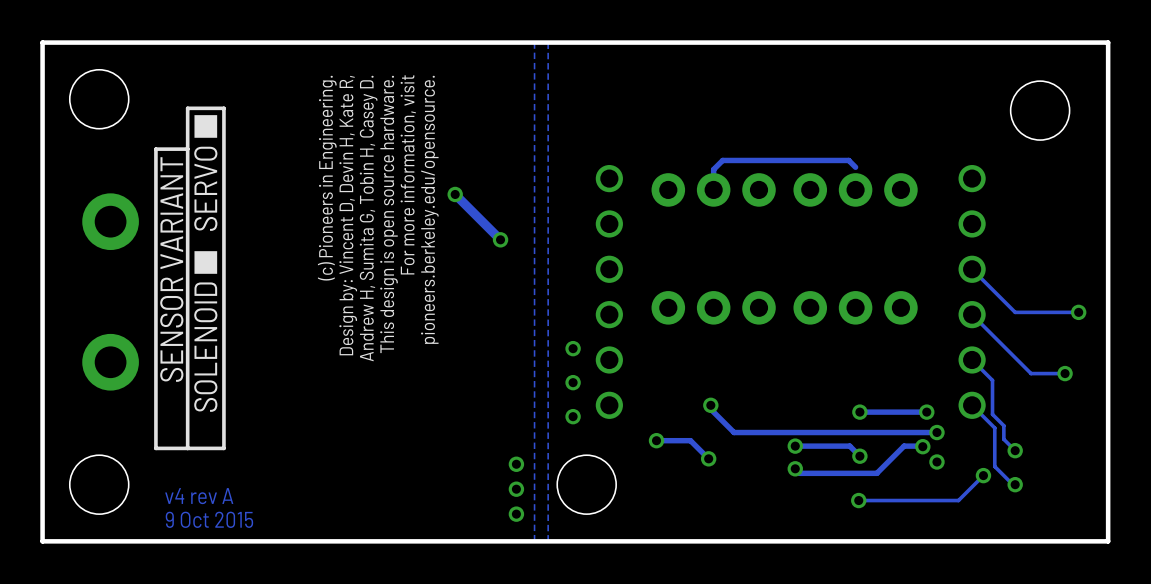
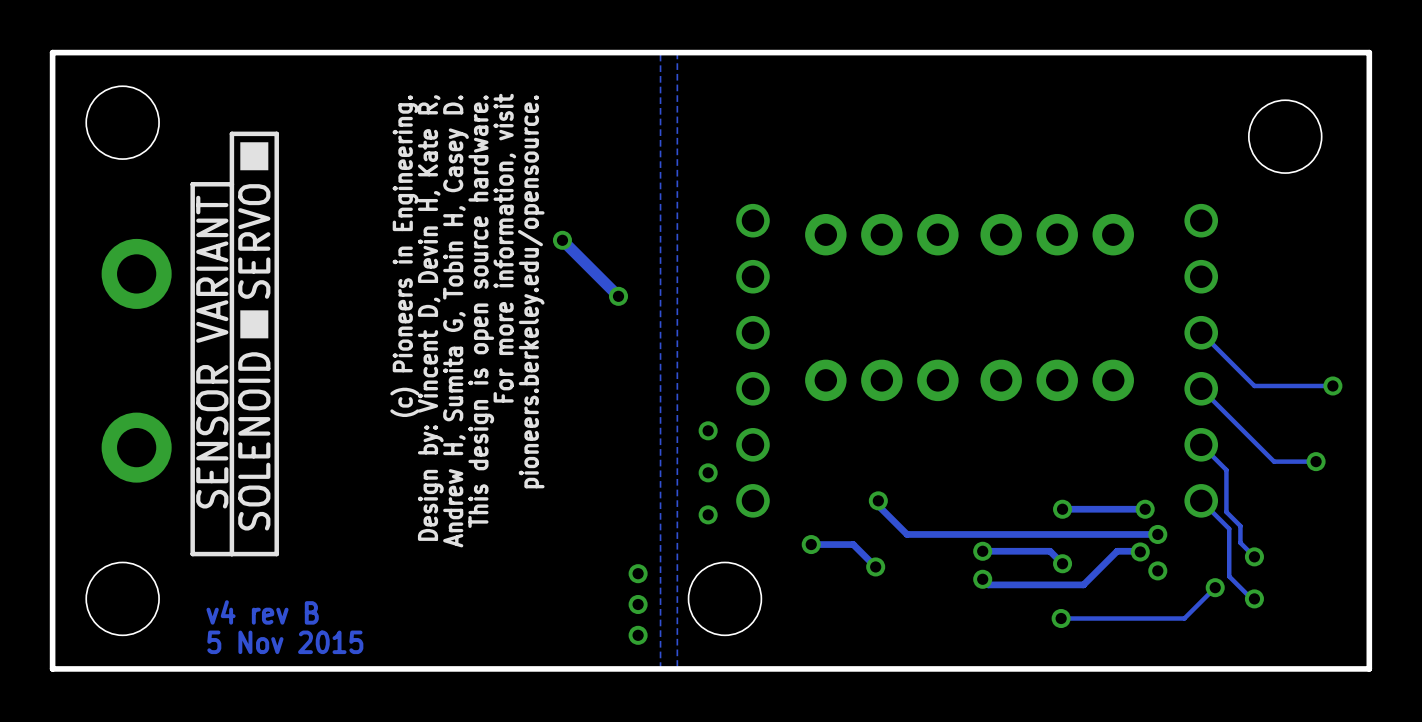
track: (855, 167) (848, 160) (722, 160) (713, 169) (713, 189) -> none
text: v4 rev A (199, 496) -> v4 rev B (262, 612)
text: 9 Oct 2015 (209, 519) -> 5 Nov 2015 (285, 642)

